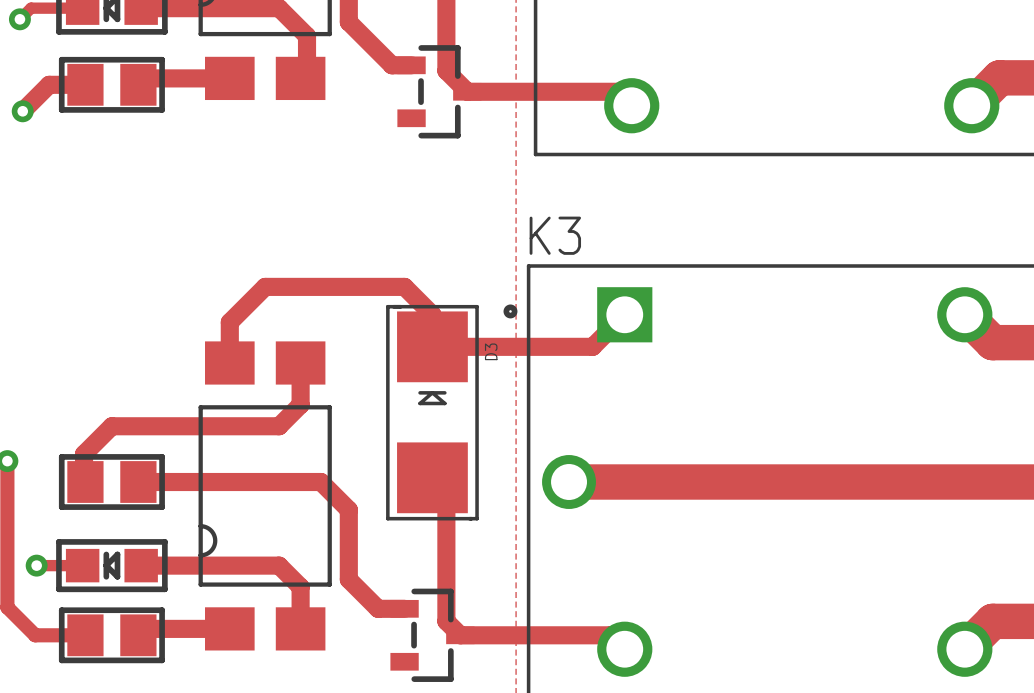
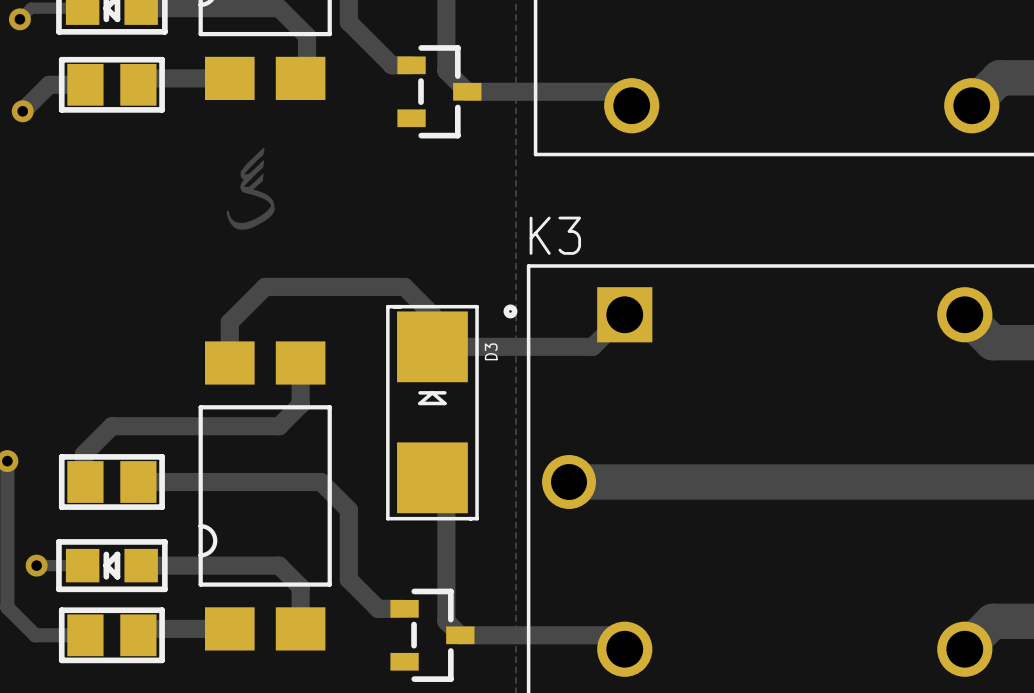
drawing: none -> [226, 147, 275, 230]

